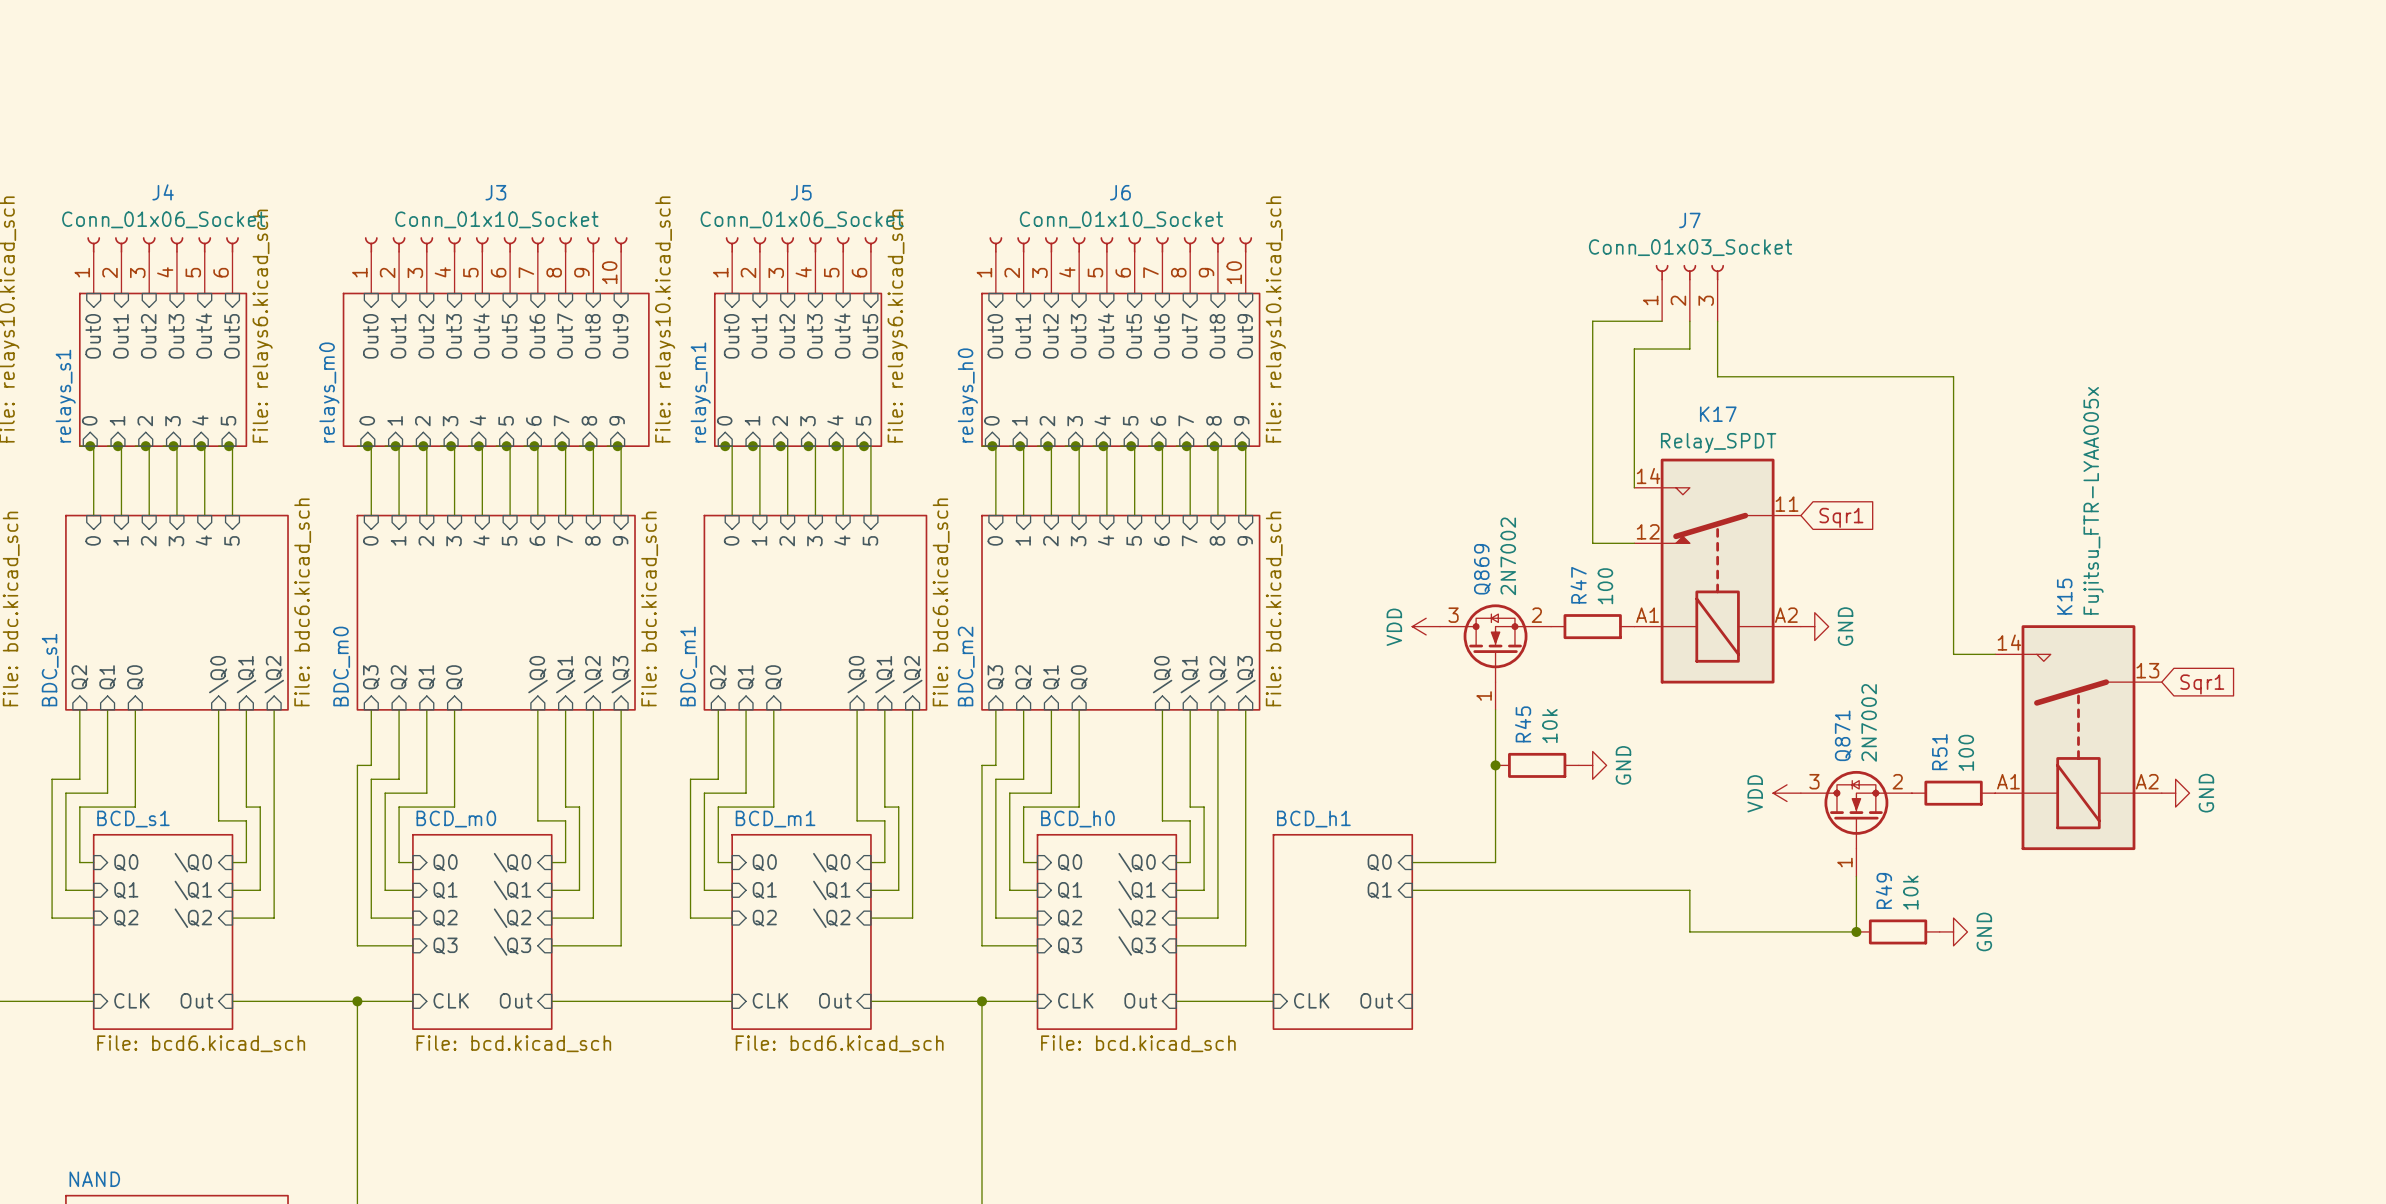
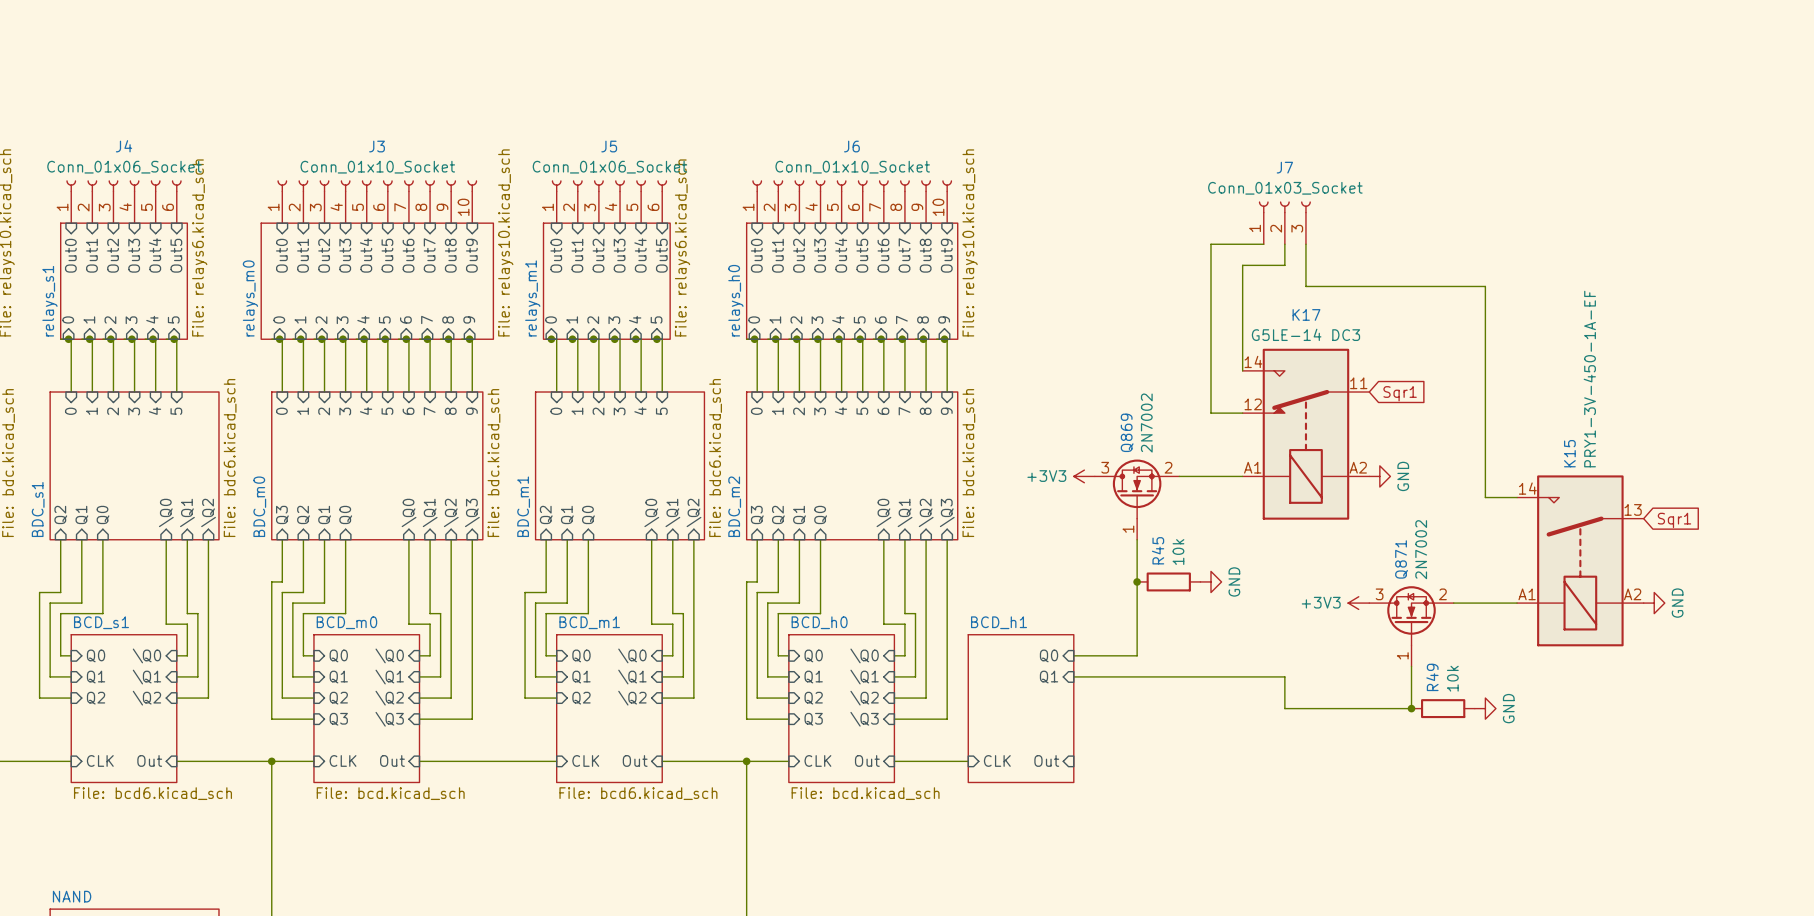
K17 value: Relay_SPDT (1718, 443) -> G5LE-14 DC3 (1305, 334)
K15 value: Fujitsu_FTR-LYAA005x (2093, 500) -> PRY1-3V-450-1A-EF (1589, 379)
power symbol: VDD (1426, 626) -> +3V3 (1084, 476)
wire: none -> (1179, 476) (1242, 476)
R47: 100 (1592, 626) -> none
power symbol: VDD (1787, 793) -> +3V3 (1358, 603)
wire: none -> (1453, 603) (1517, 603)
R51: 100 (1953, 793) -> none

